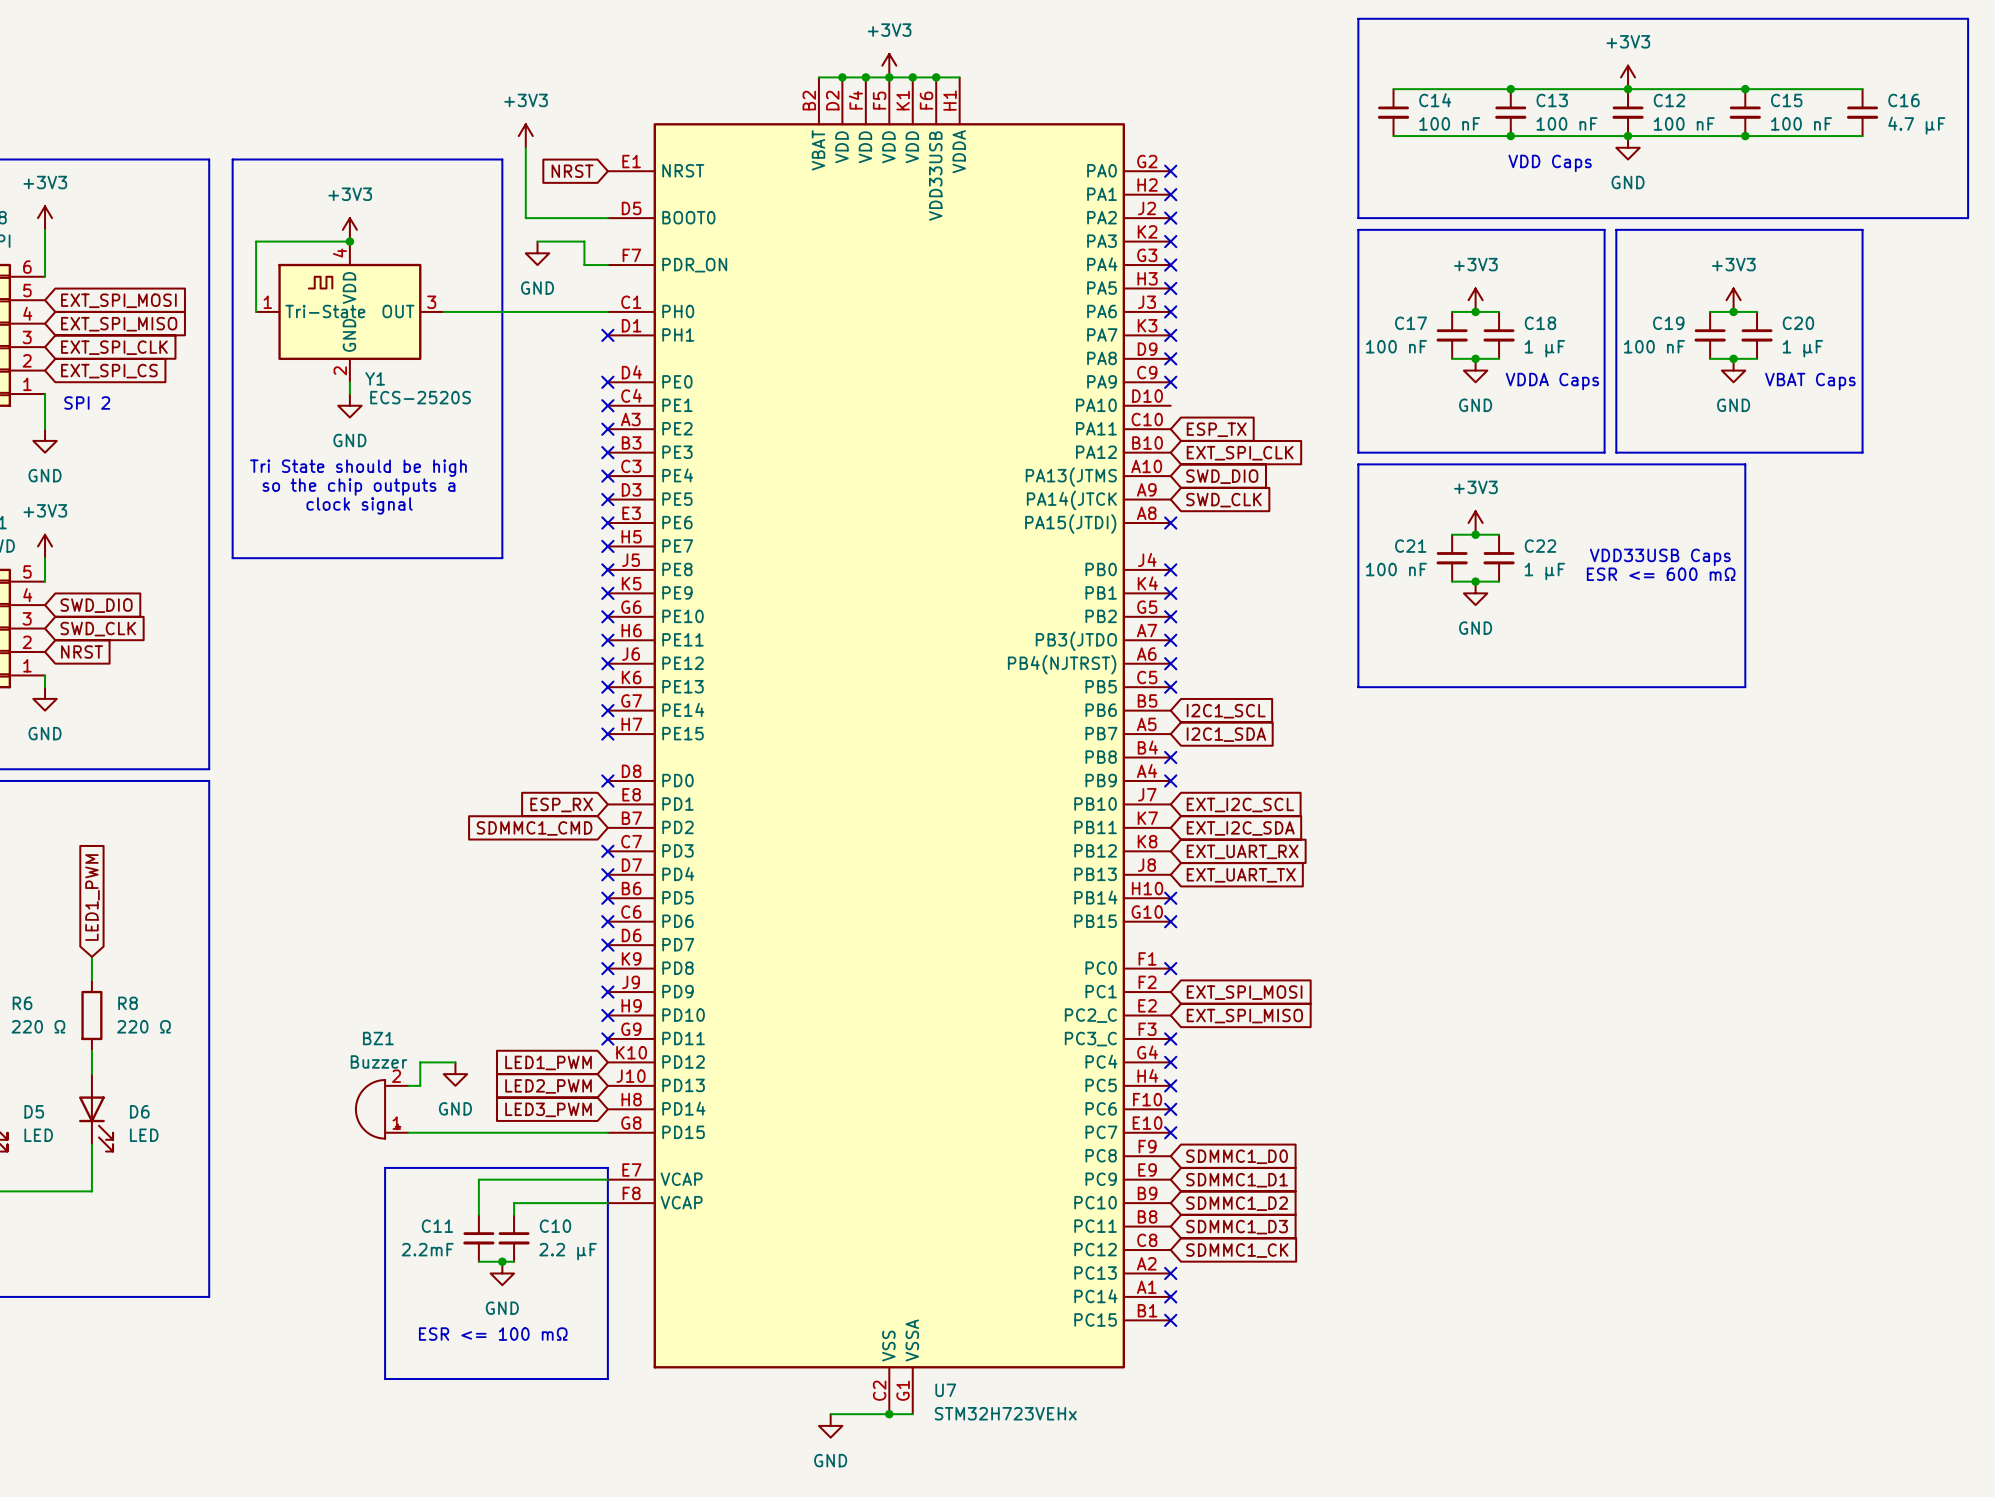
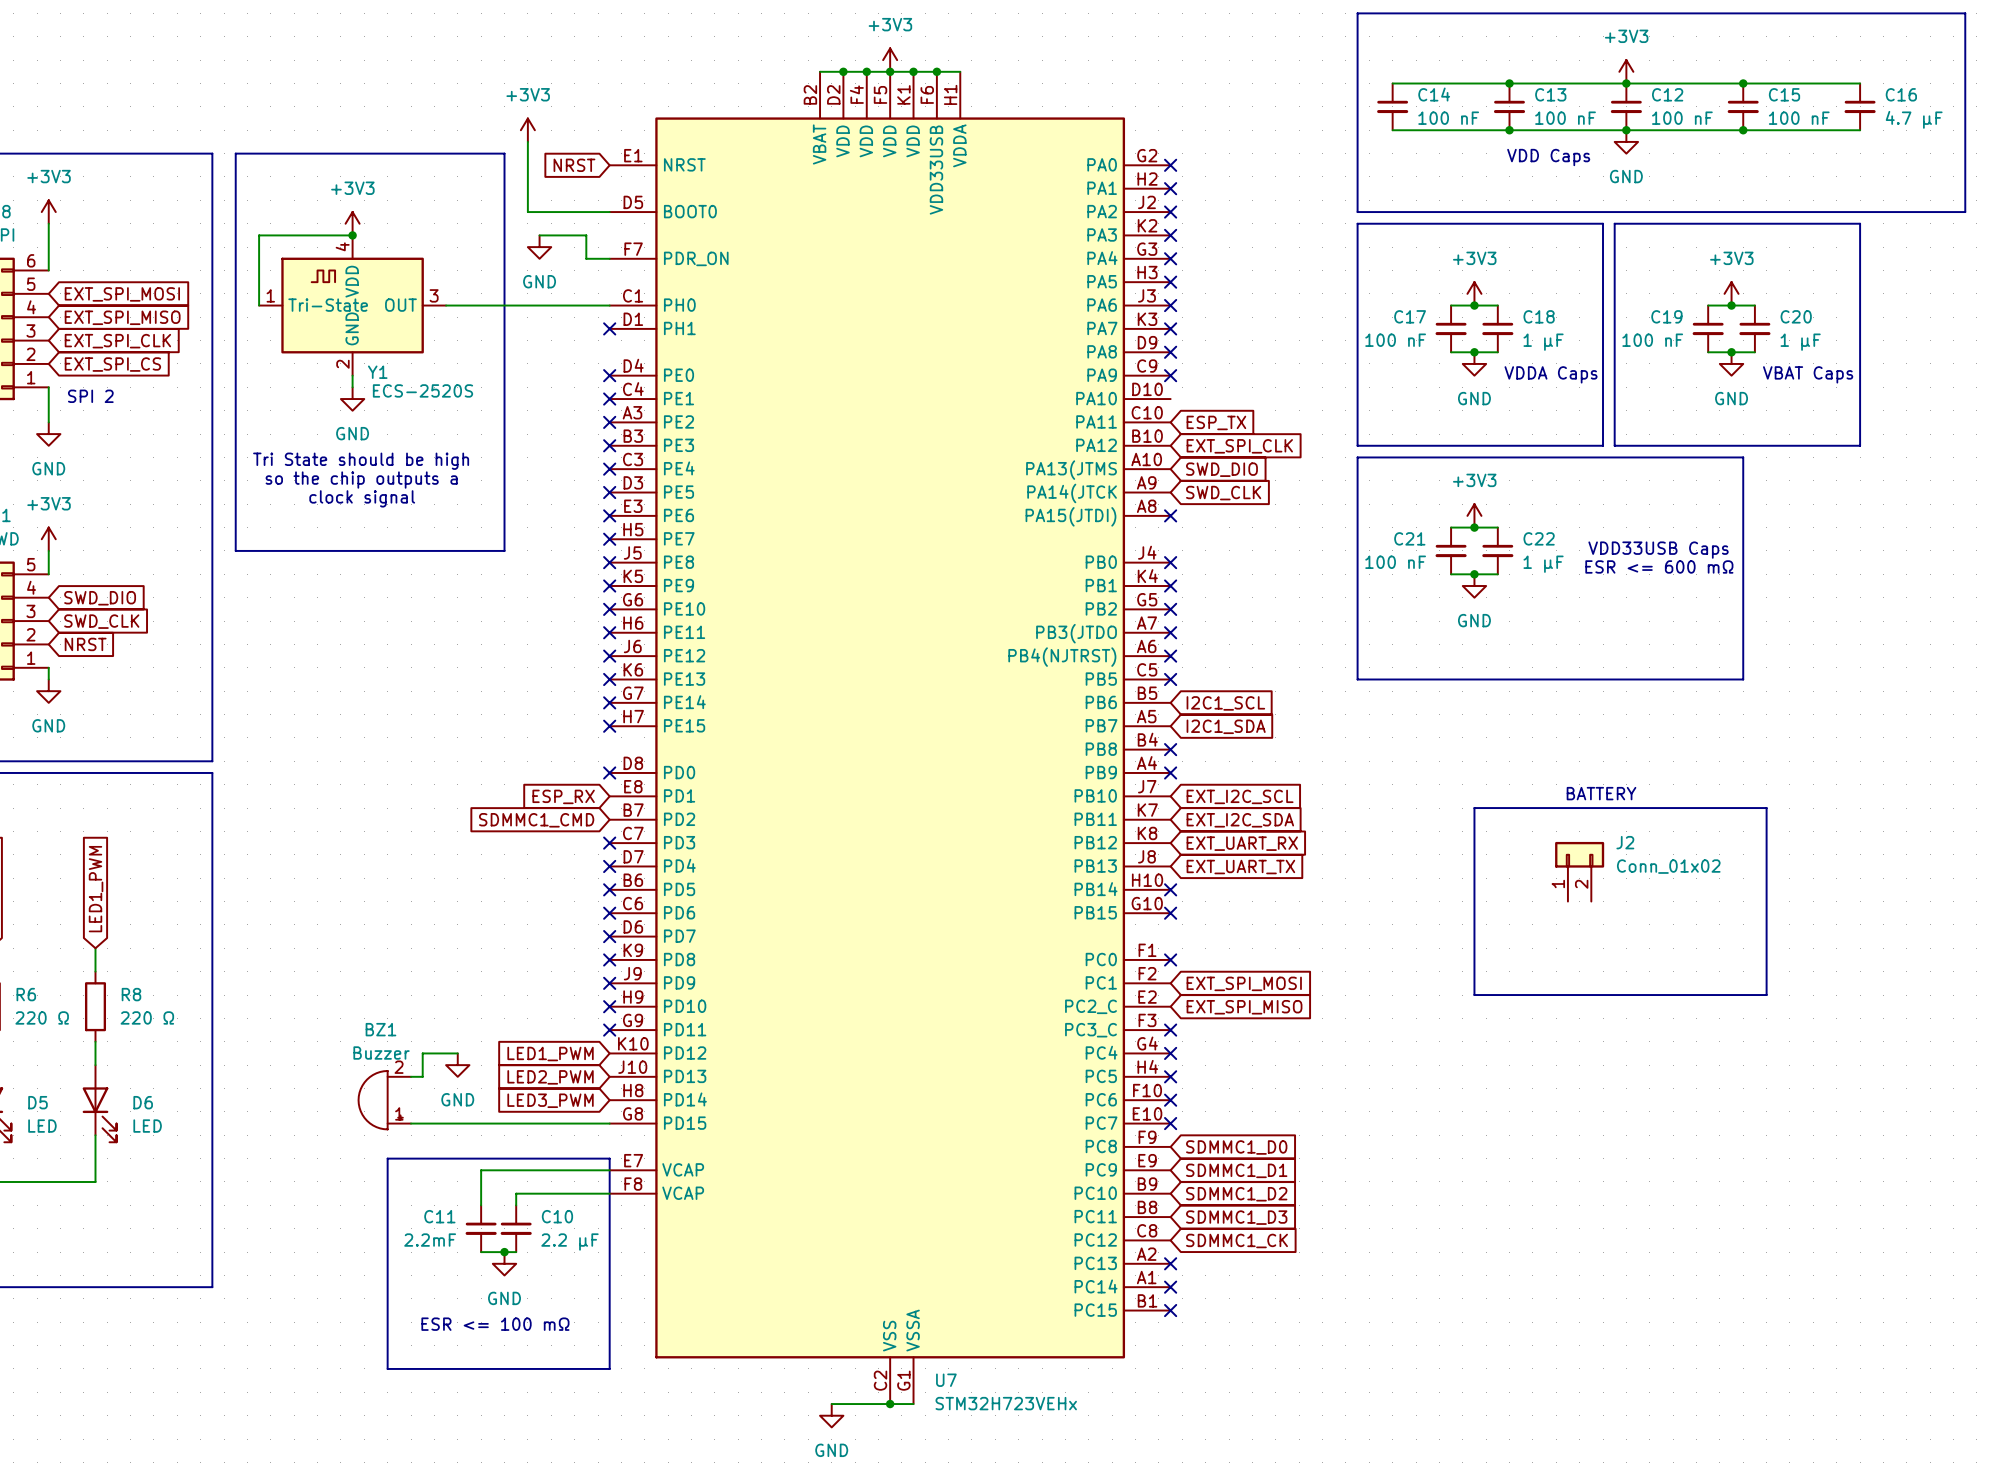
text: none -> BATTERY (1601, 793)
line: none -> (1474, 808) (1766, 808) (1766, 995) (1474, 995) (1474, 808)
J2: none -> Conn_01x02 (1579, 871)

